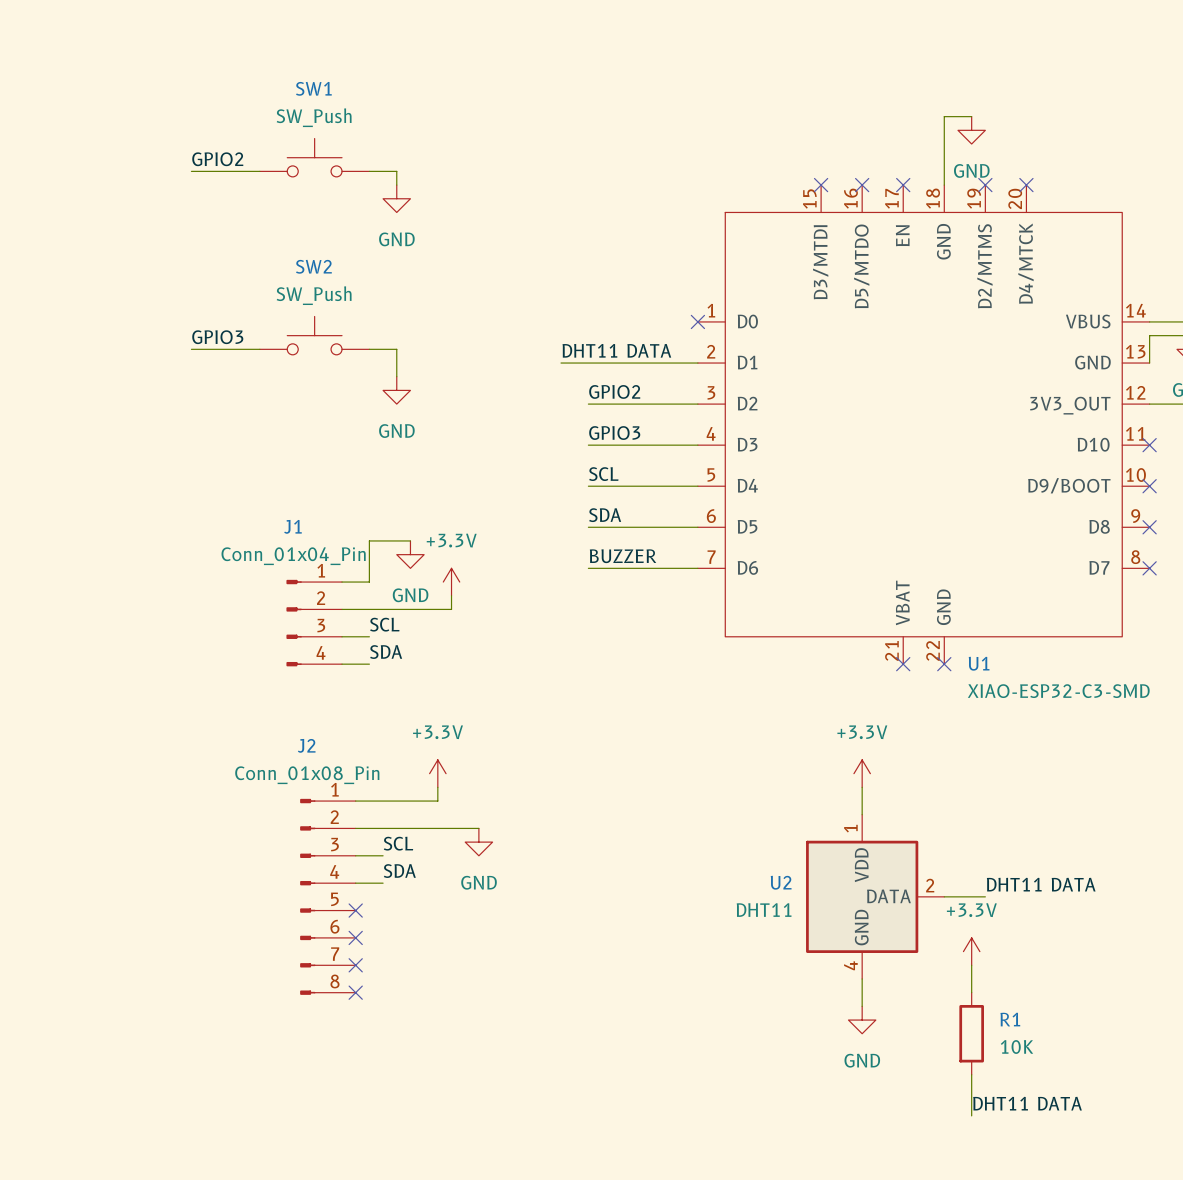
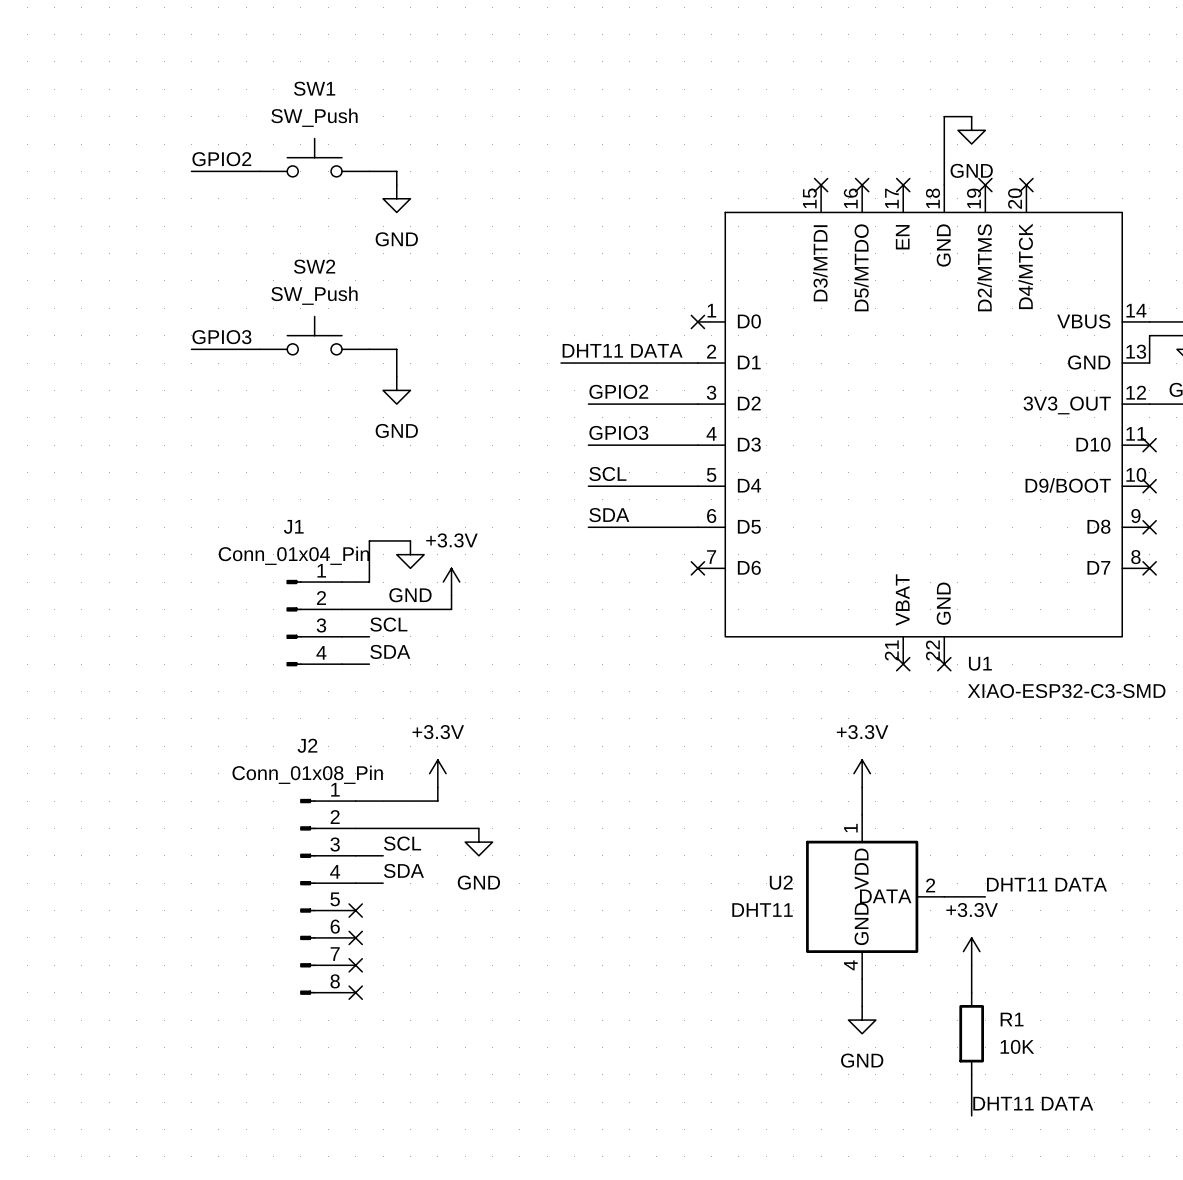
label: BUZZER (623, 556) -> none
wire: (588, 568) (697, 568) -> none
no-connect mark: none -> (697, 568)

